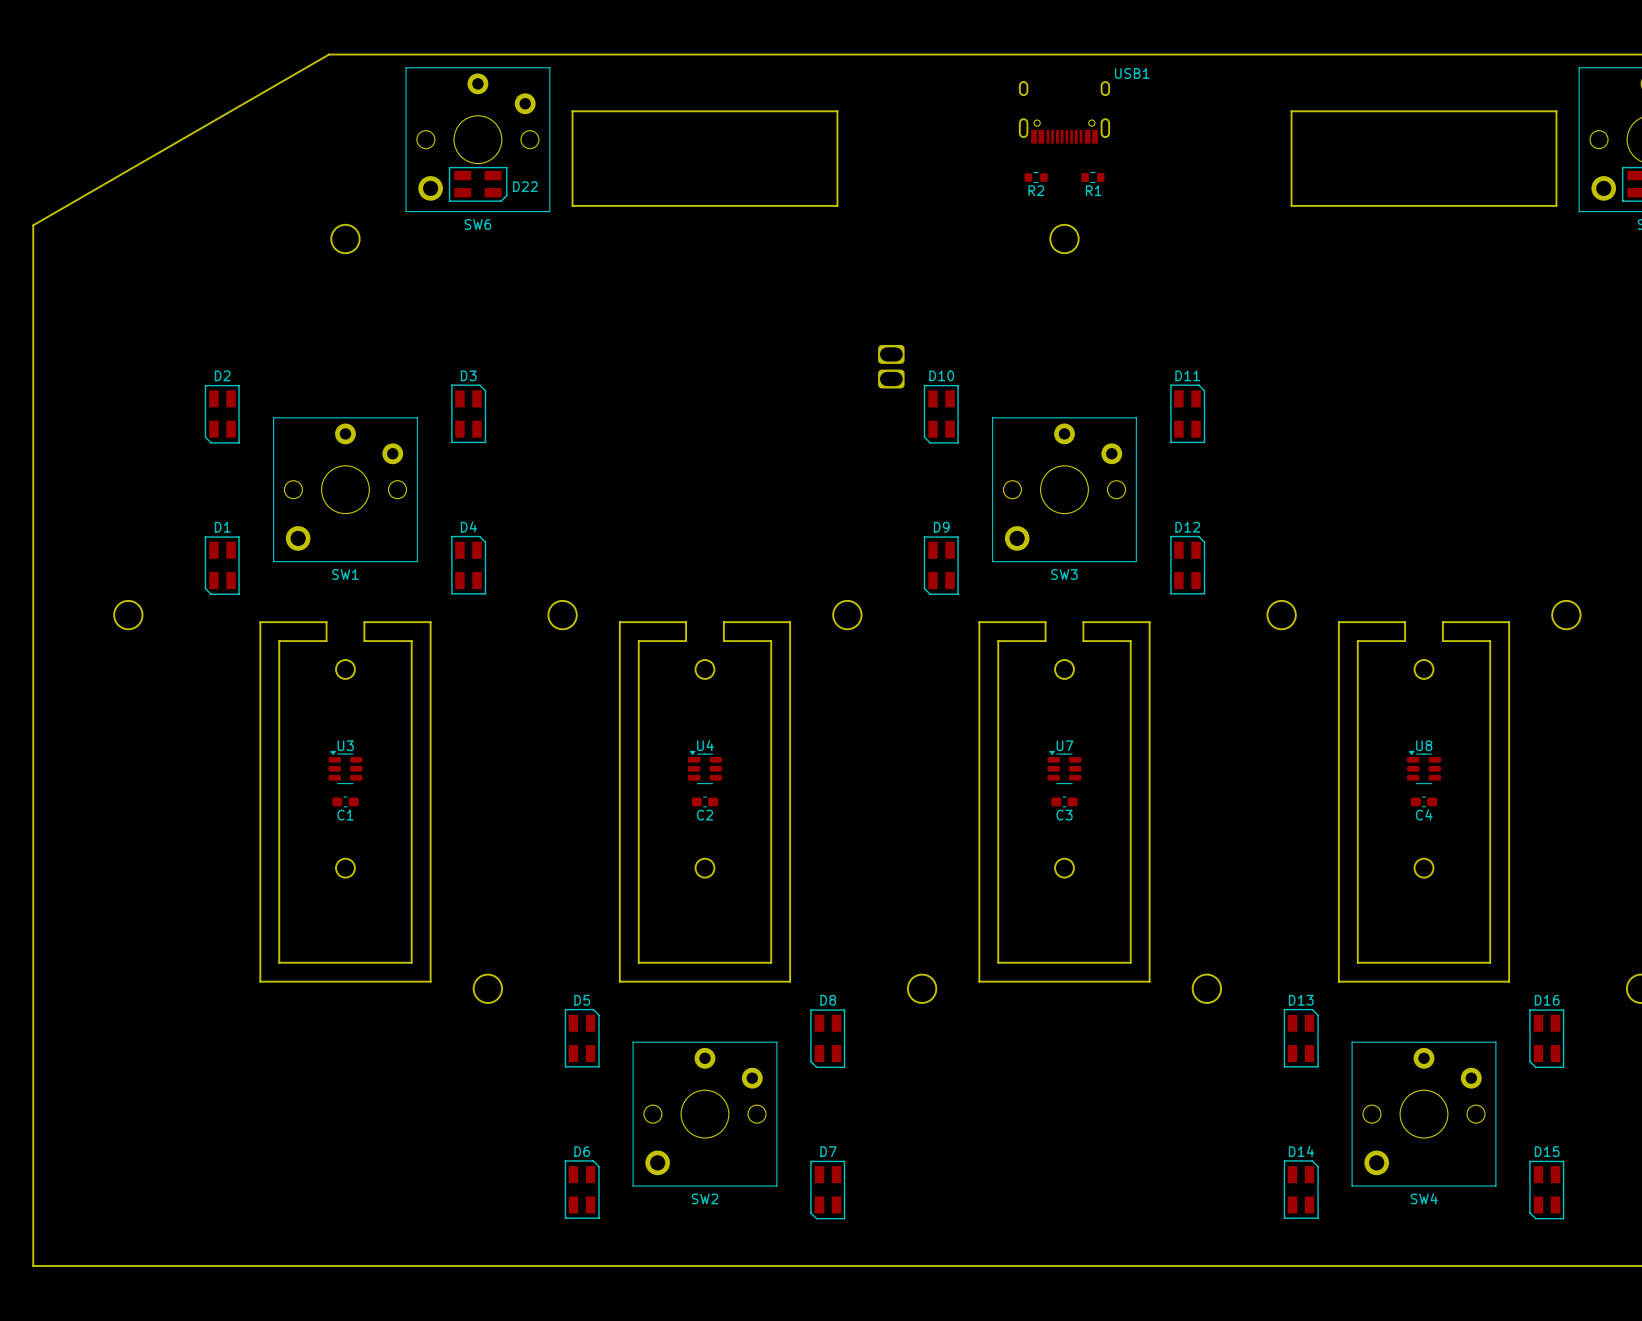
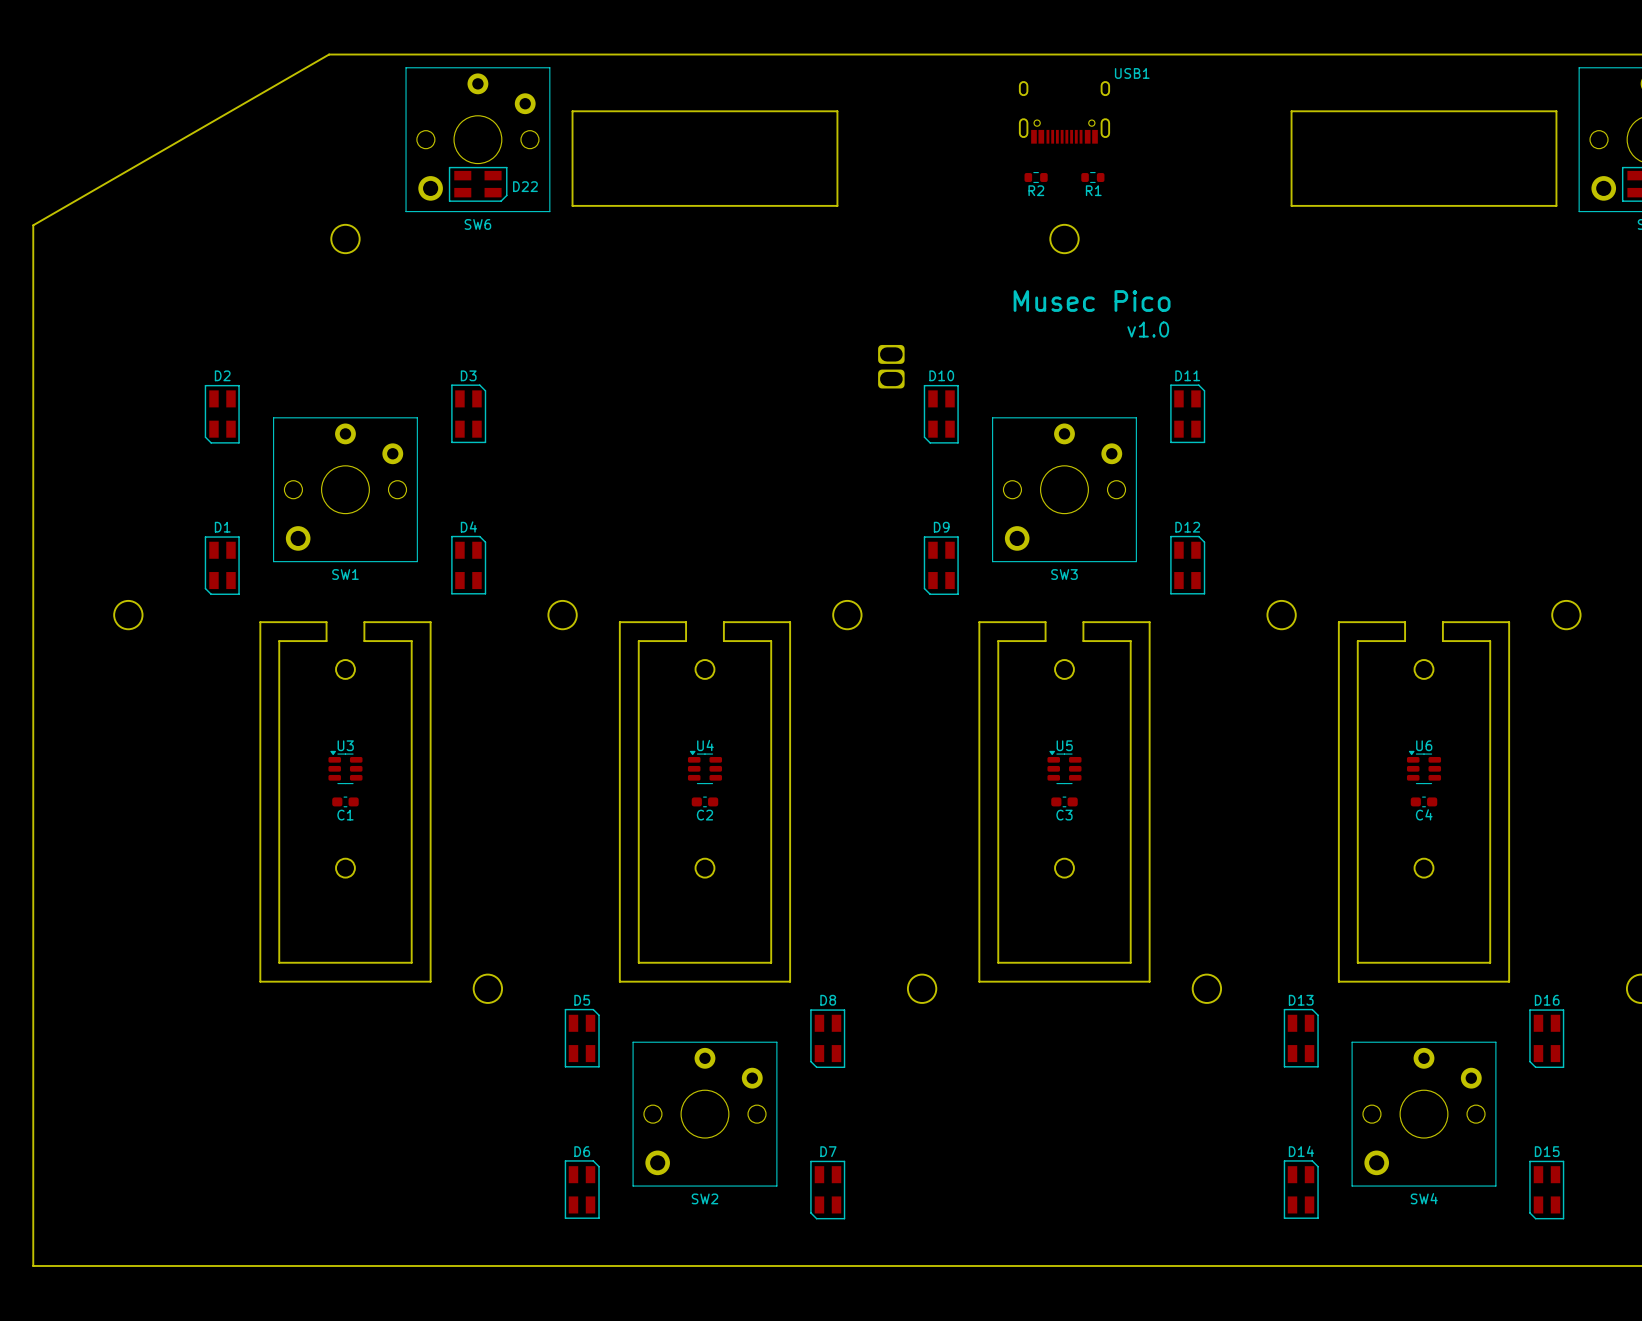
text: none -> Musec Pico (1092, 301)
text: none -> v1.0 (1148, 329)
U7 name: U7 (1064, 745) -> U5 (1064, 745)
U8 name: U8 (1424, 745) -> U6 (1424, 745)

